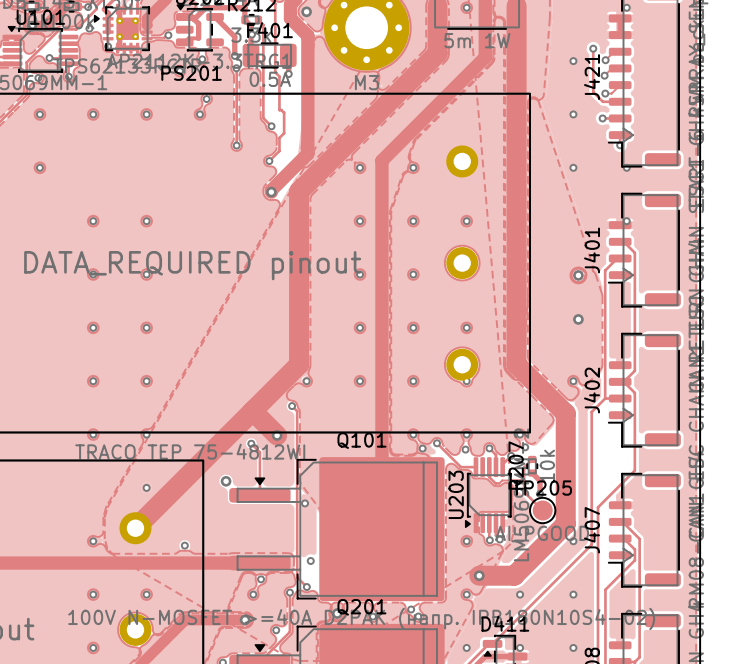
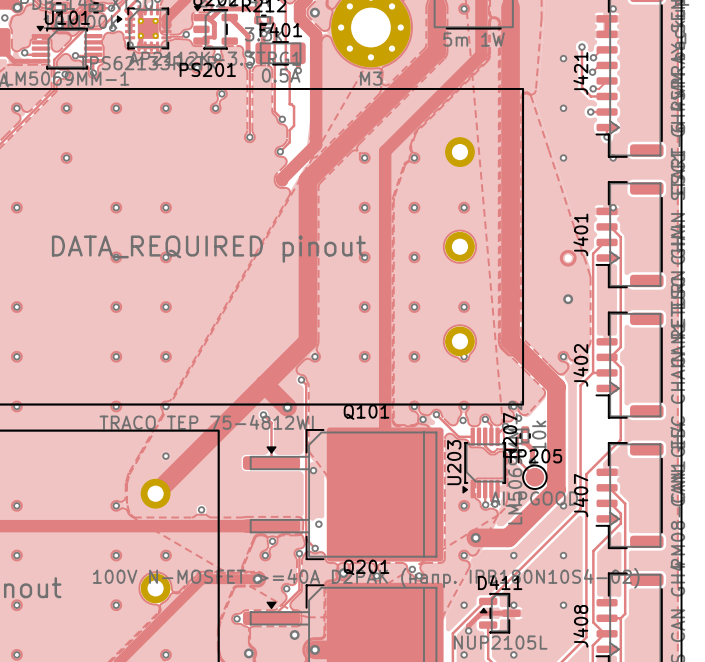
via: (271, 192) -> none
via: (578, 275) -> none
via: (226, 481) -> none

